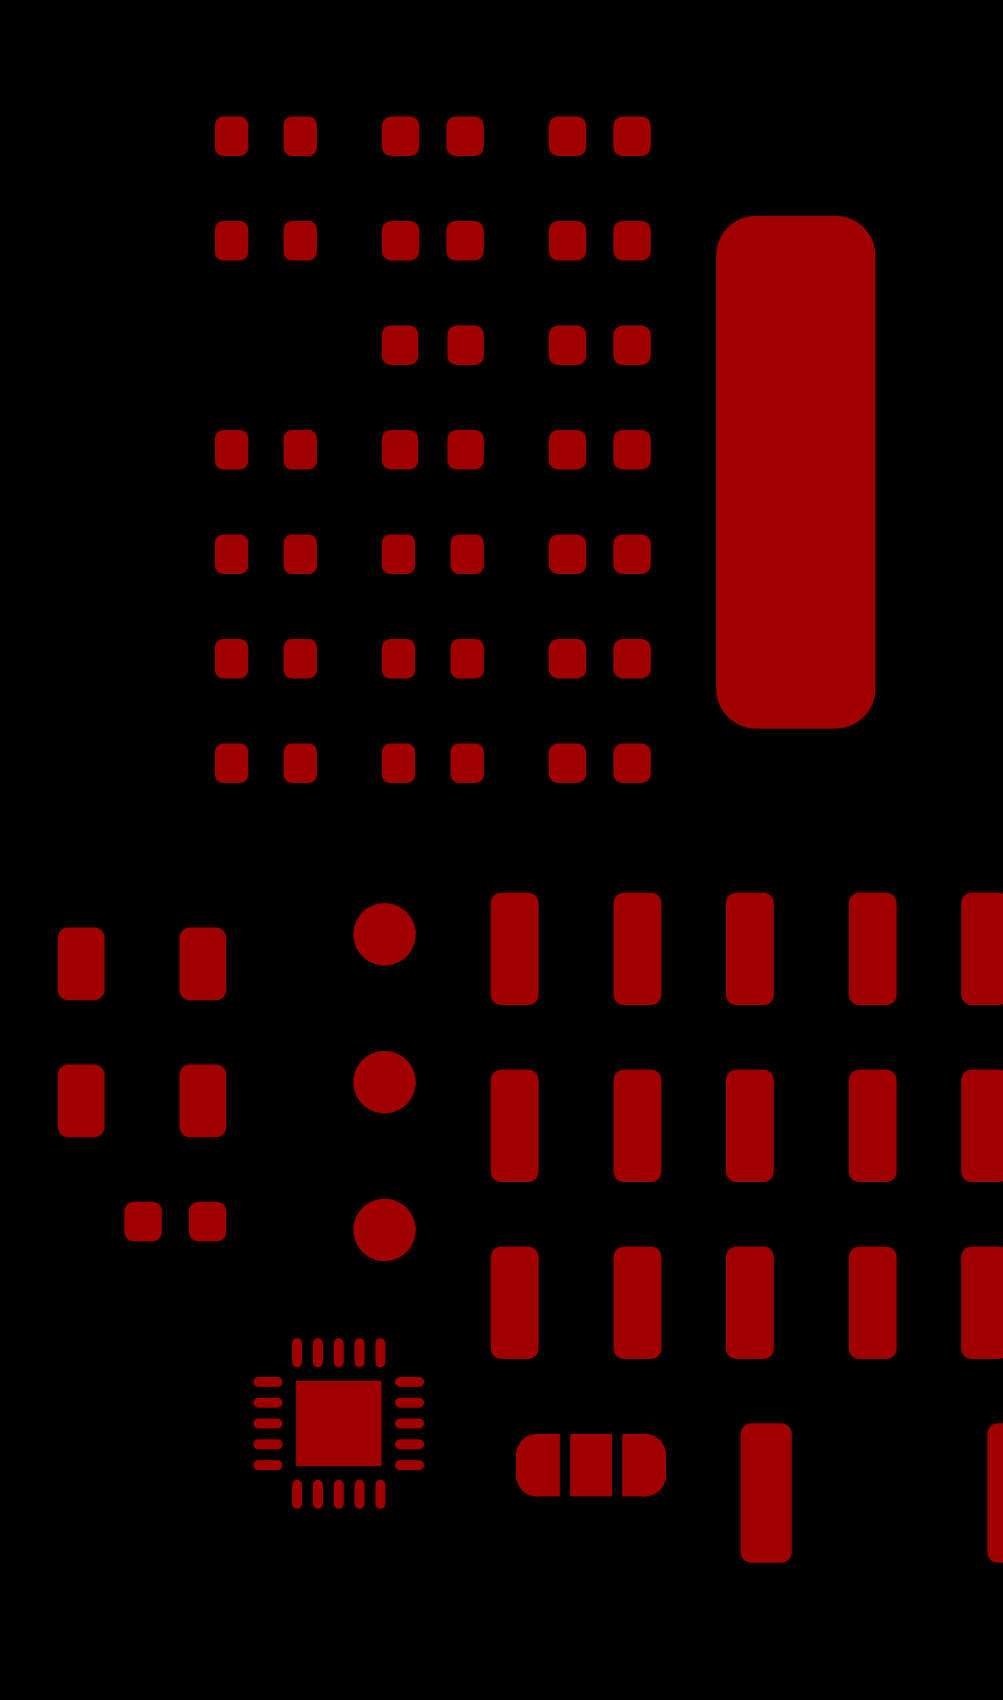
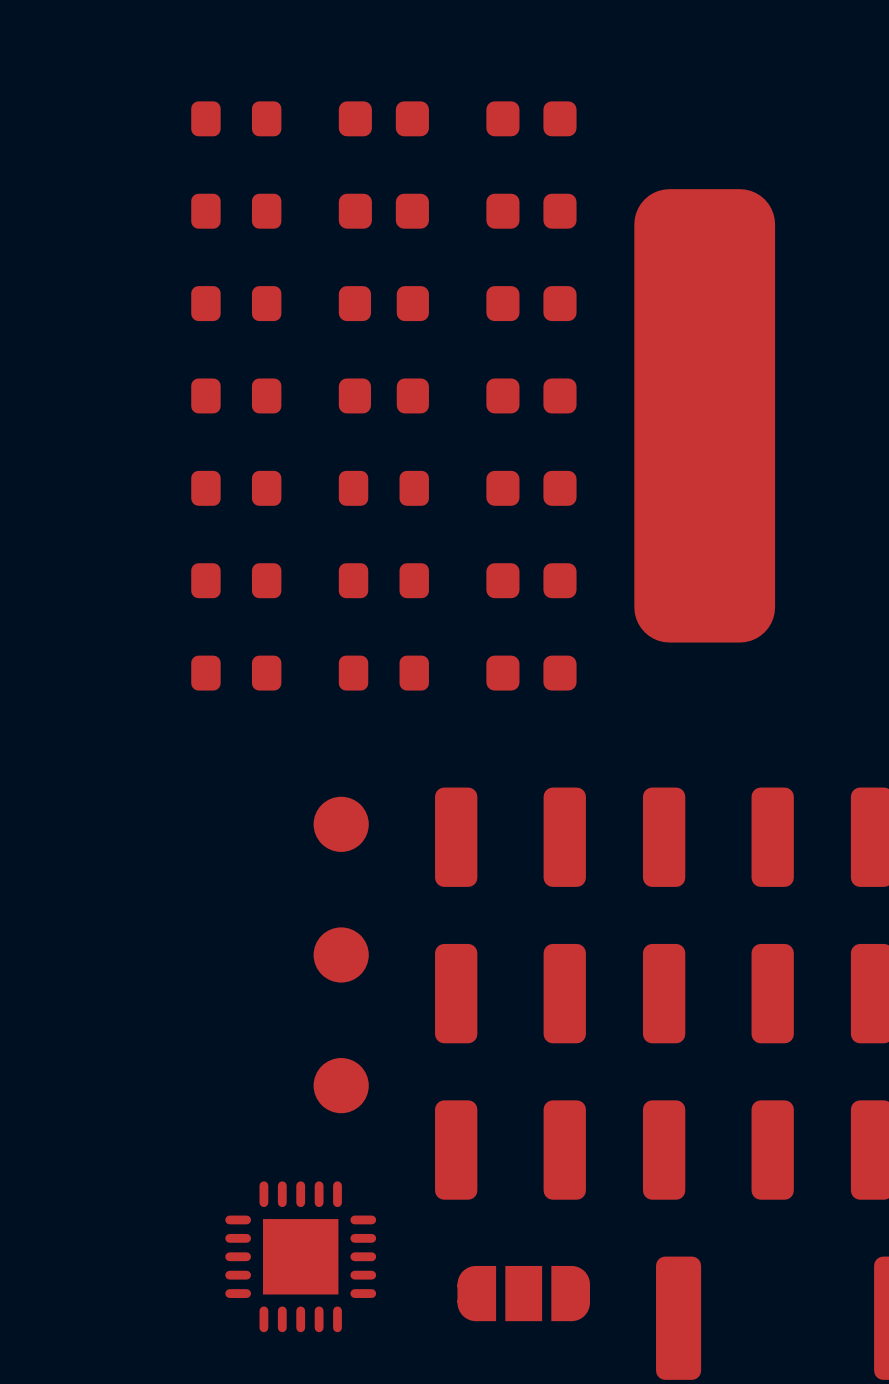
part: none -> (236, 303)
part: (142, 963) -> none
part: (142, 1100) -> none
part: (175, 1221) -> none

